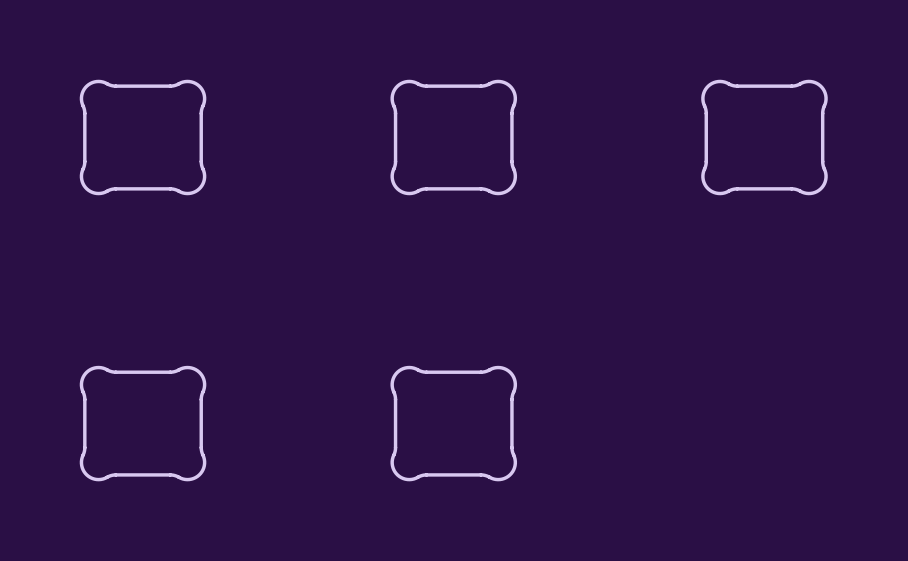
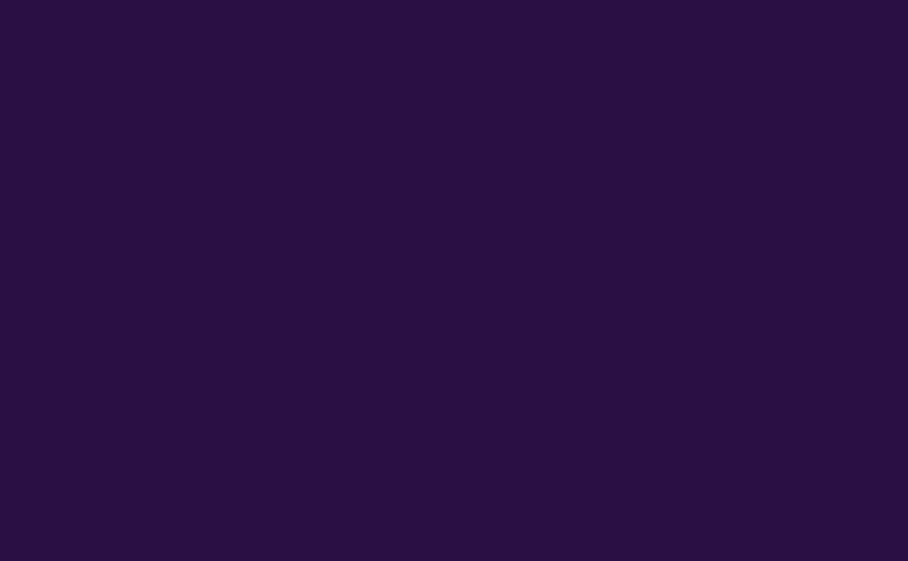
part: (143, 137) -> none
part: (453, 137) -> none
part: (764, 137) -> none
part: (143, 423) -> none
part: (453, 423) -> none

